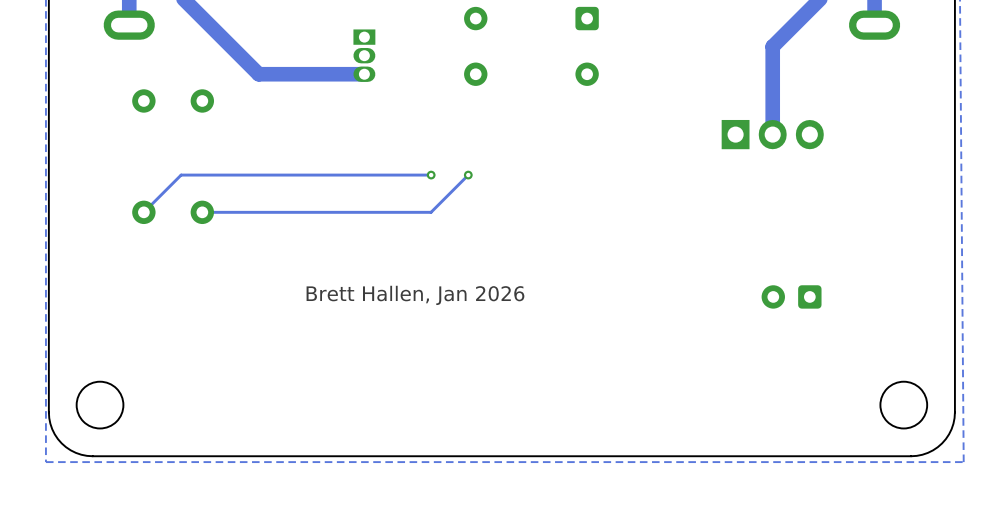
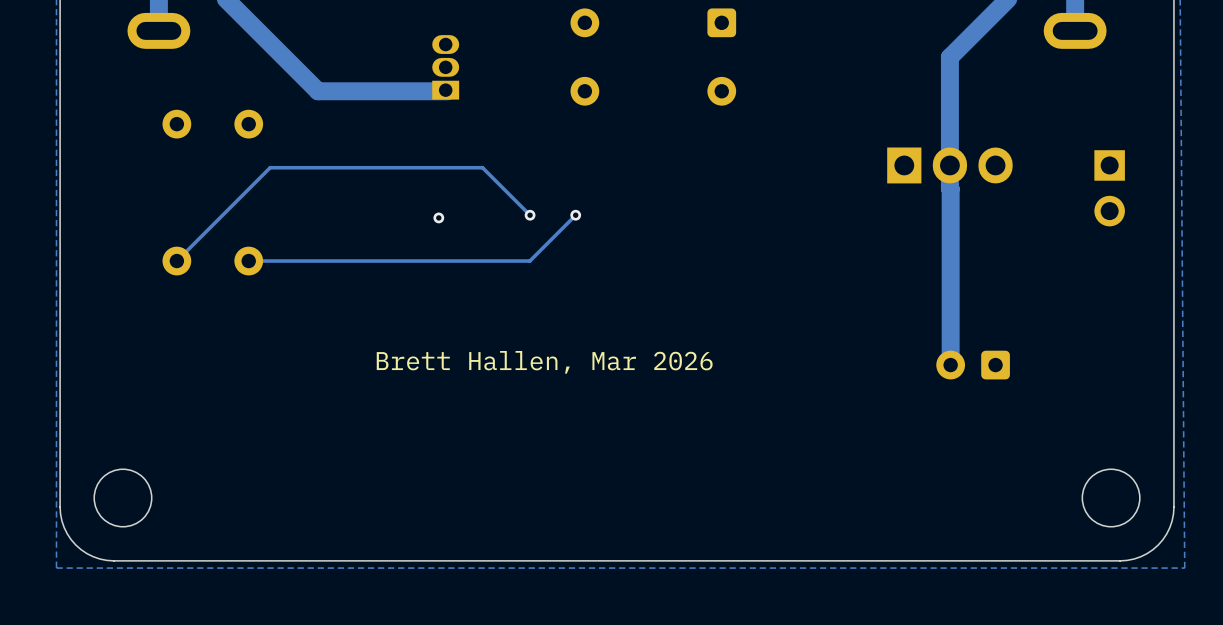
part rotation: 0° (364, 55) -> 180° (445, 67)
track: none -> (949, 165) (950, 365)
part: none -> (1109, 188)
track: (431, 175) (181, 175) -> (530, 215) (482, 167) (270, 167) (222, 215)
via: none -> (438, 217)
text: Brett Hallen, Jan 2026 (415, 295) -> Brett Hallen, Mar 2026 (544, 362)

